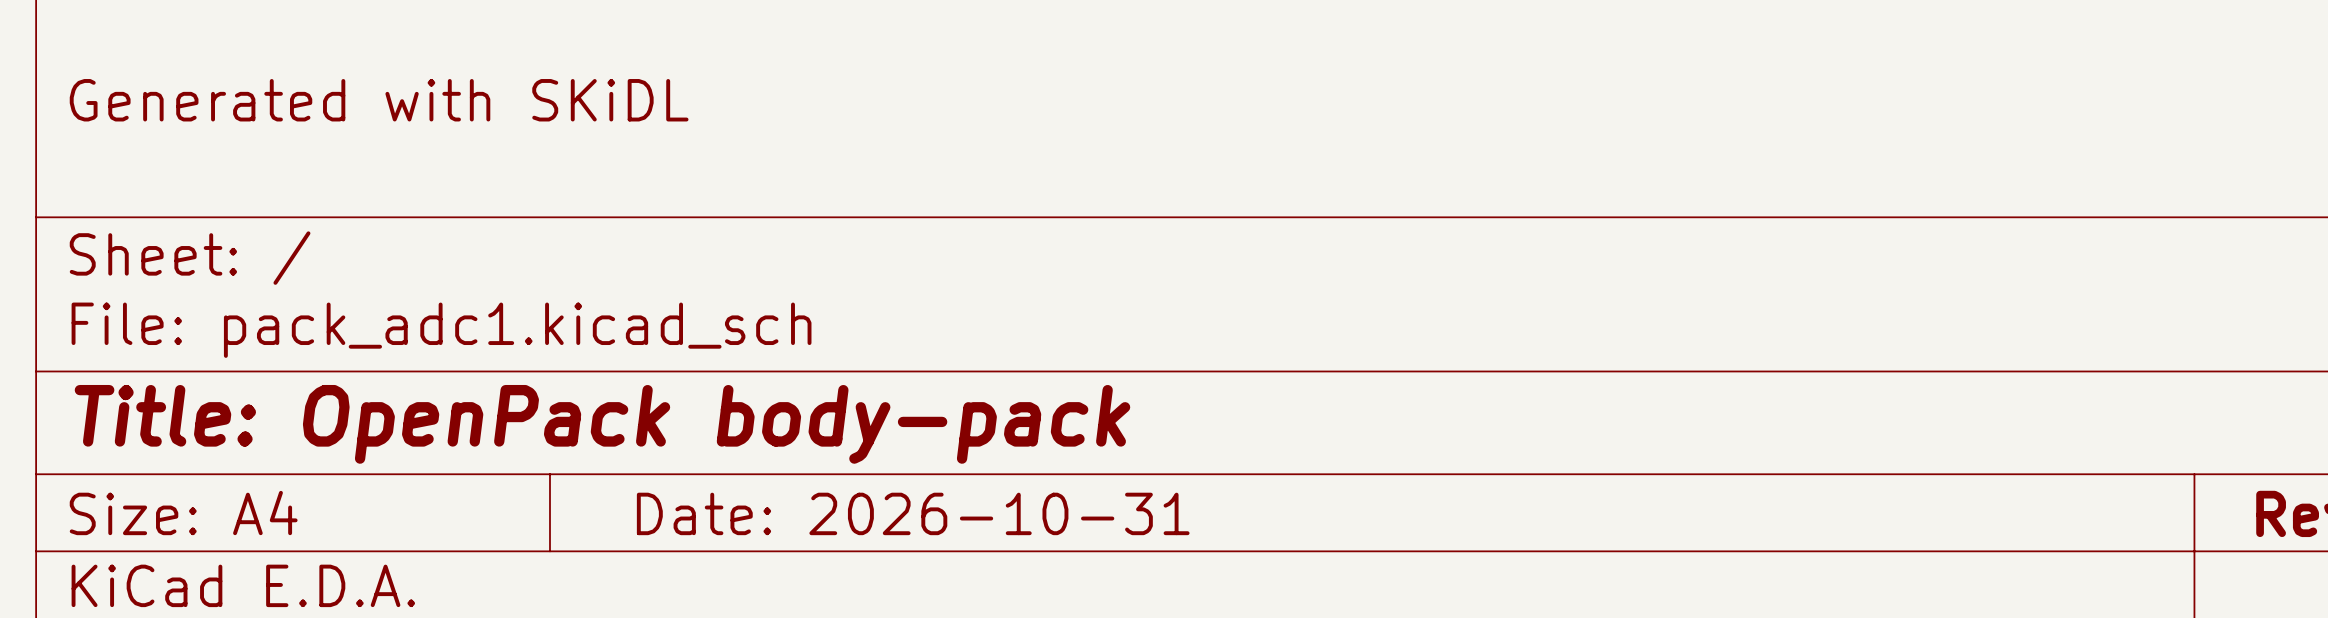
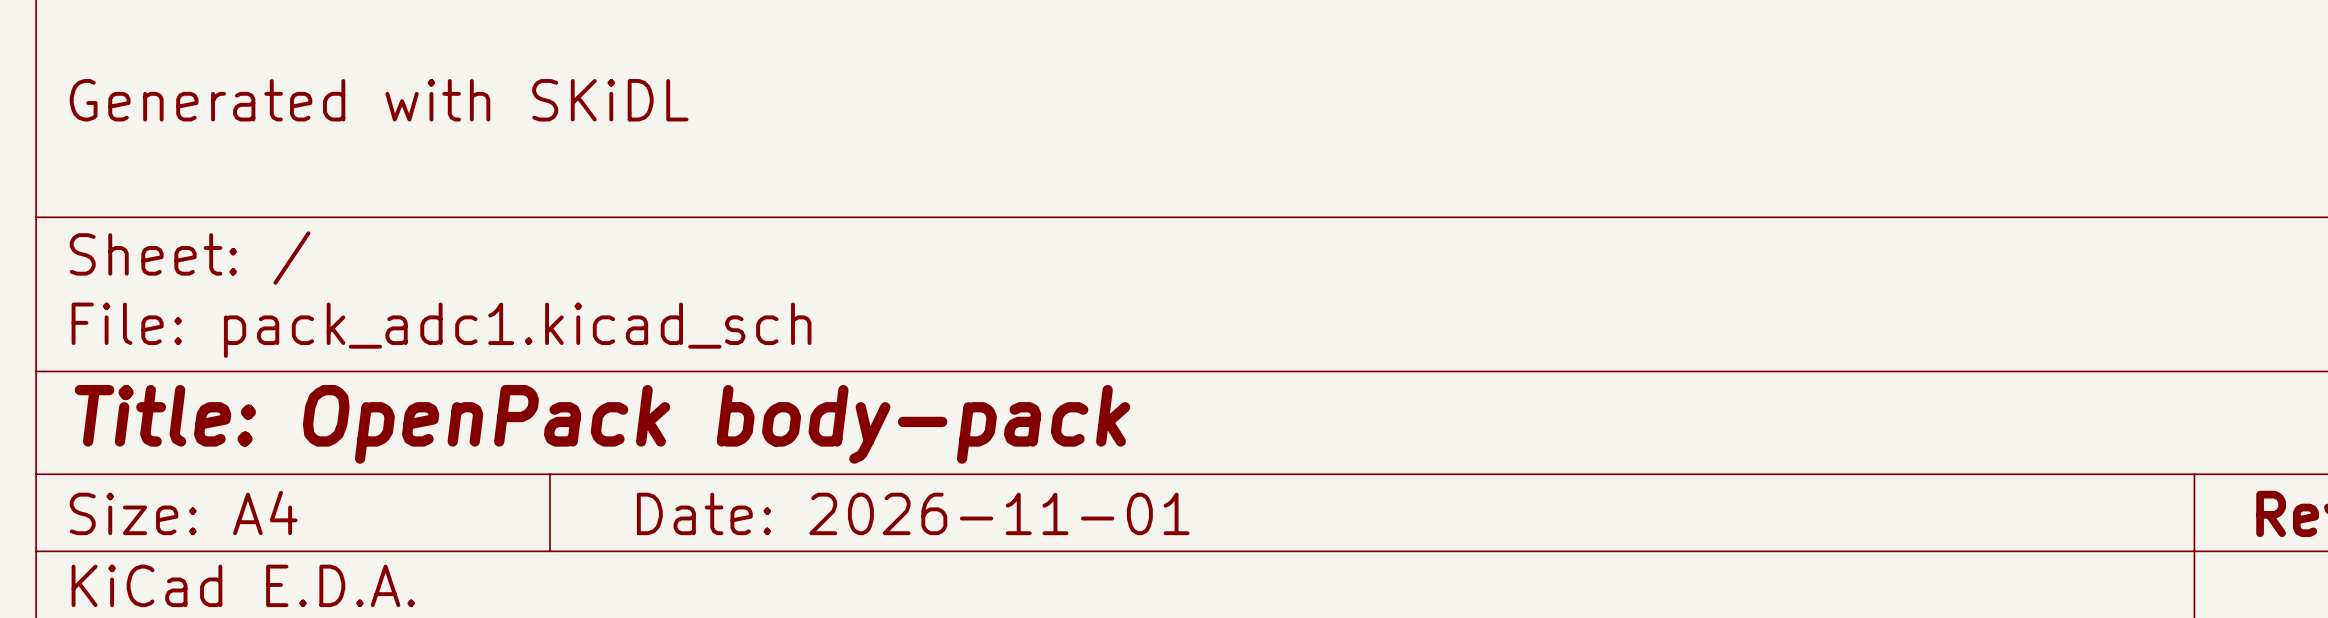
title block: Date: 2026-10-31 (913, 513) -> Date: 2026-11-01 (913, 513)

